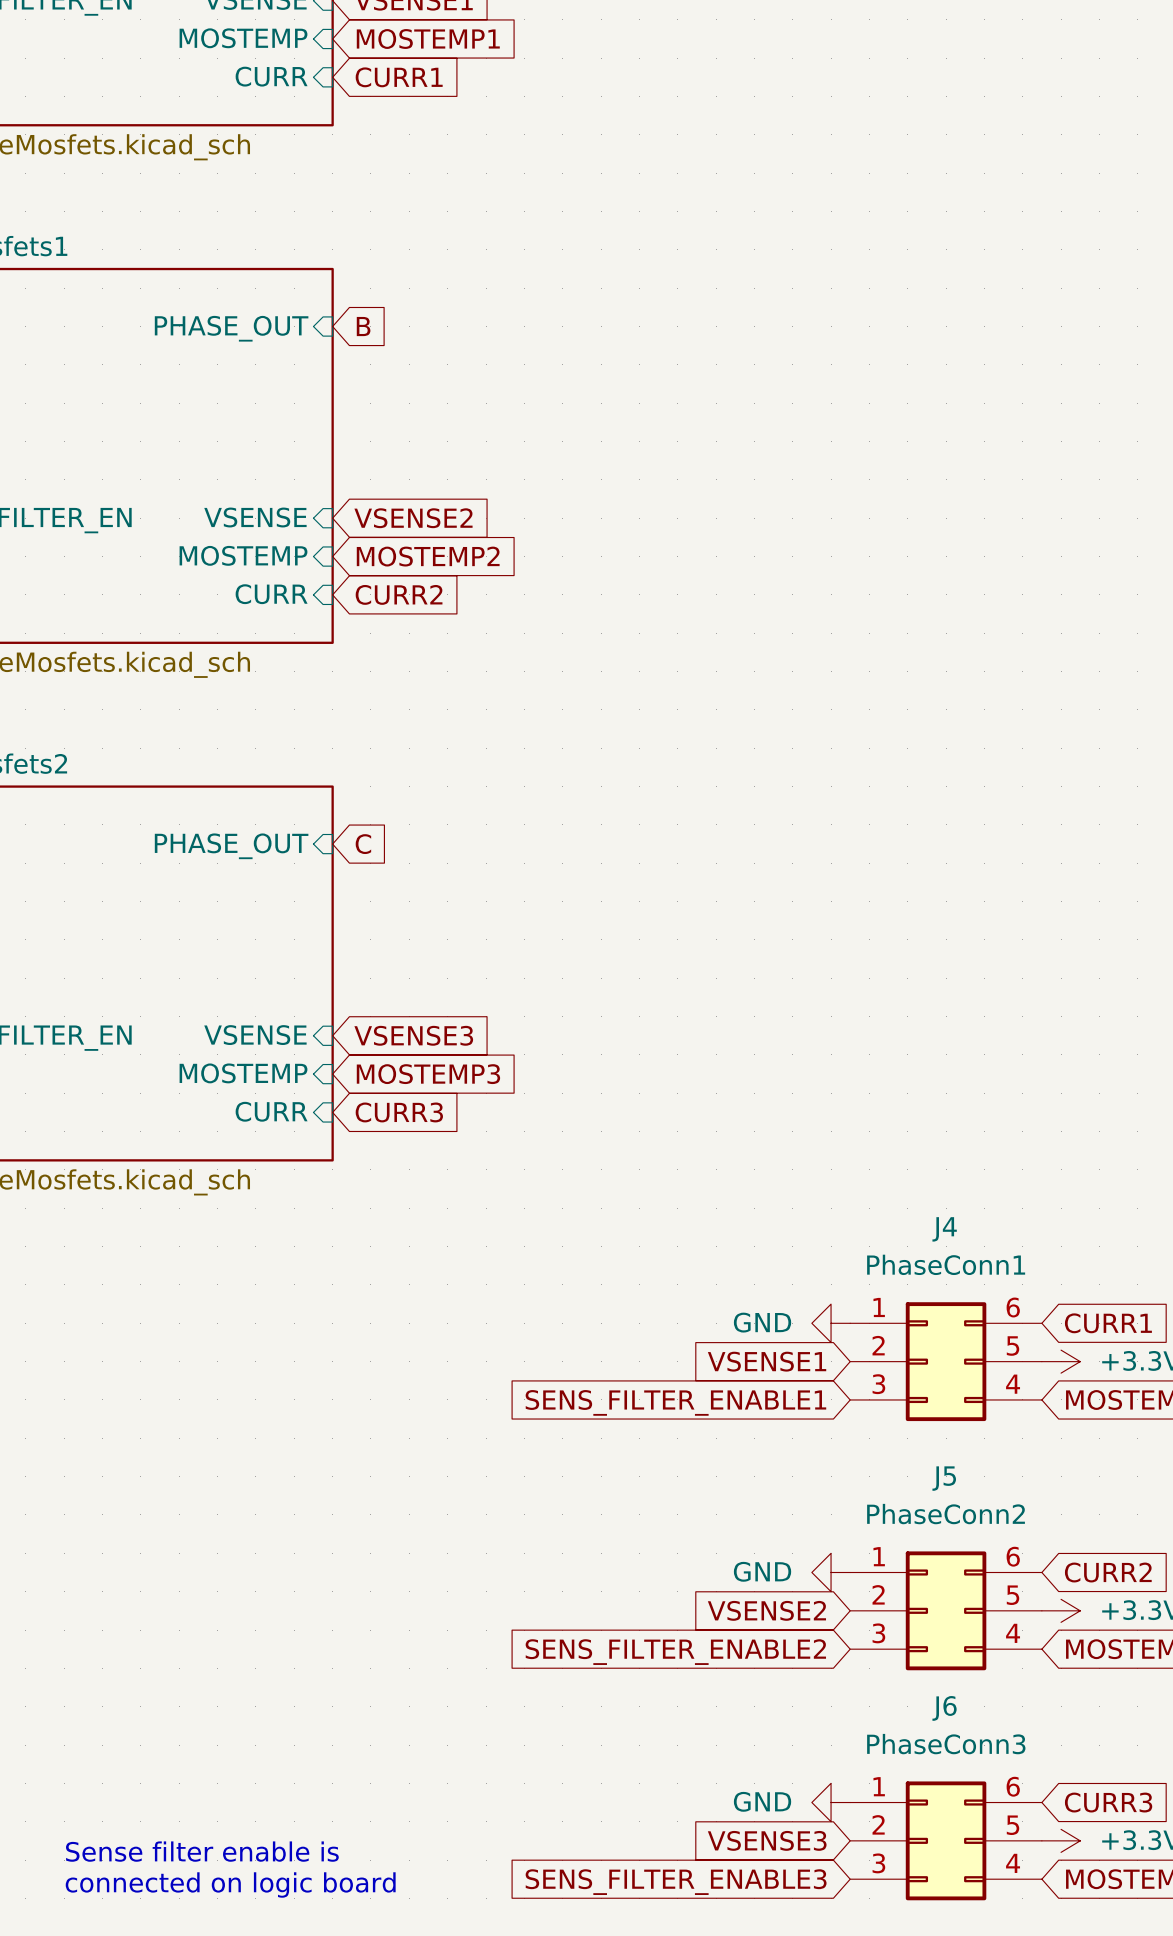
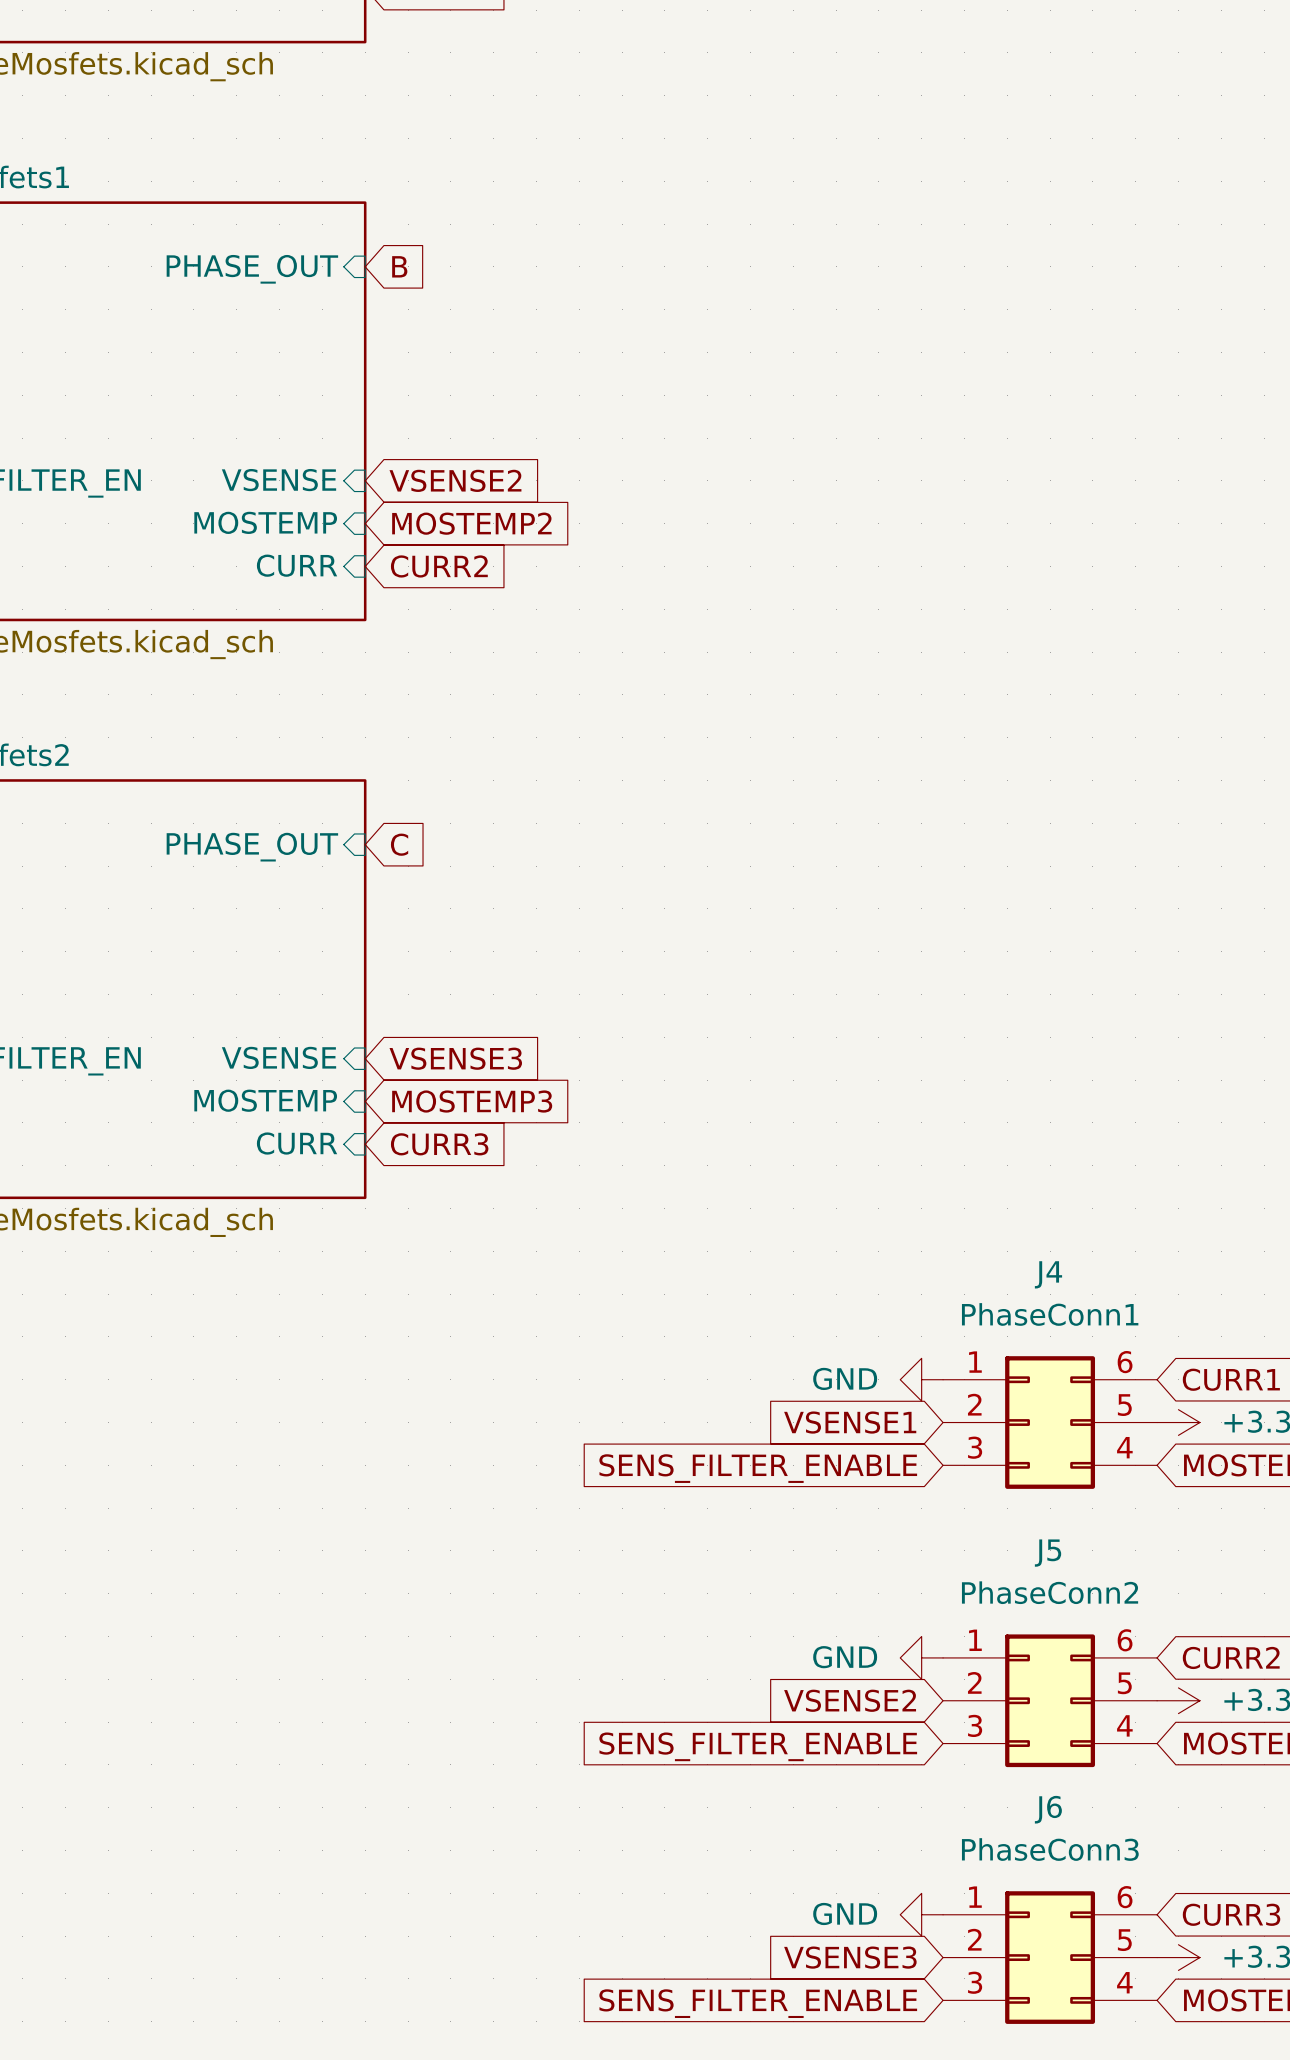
global label: SENS_FILTER_ENABLE1 (675, 1402) -> SENS_FILTER_ENABLE (758, 1468)
global label: SENS_FILTER_ENABLE2 (675, 1652) -> SENS_FILTER_ENABLE (758, 1746)
text: Sense filter enable is (202, 1851) -> none
global label: SENS_FILTER_ENABLE3 (676, 1882) -> SENS_FILTER_ENABLE (758, 2003)
text: connected on logic board (230, 1884) -> none

